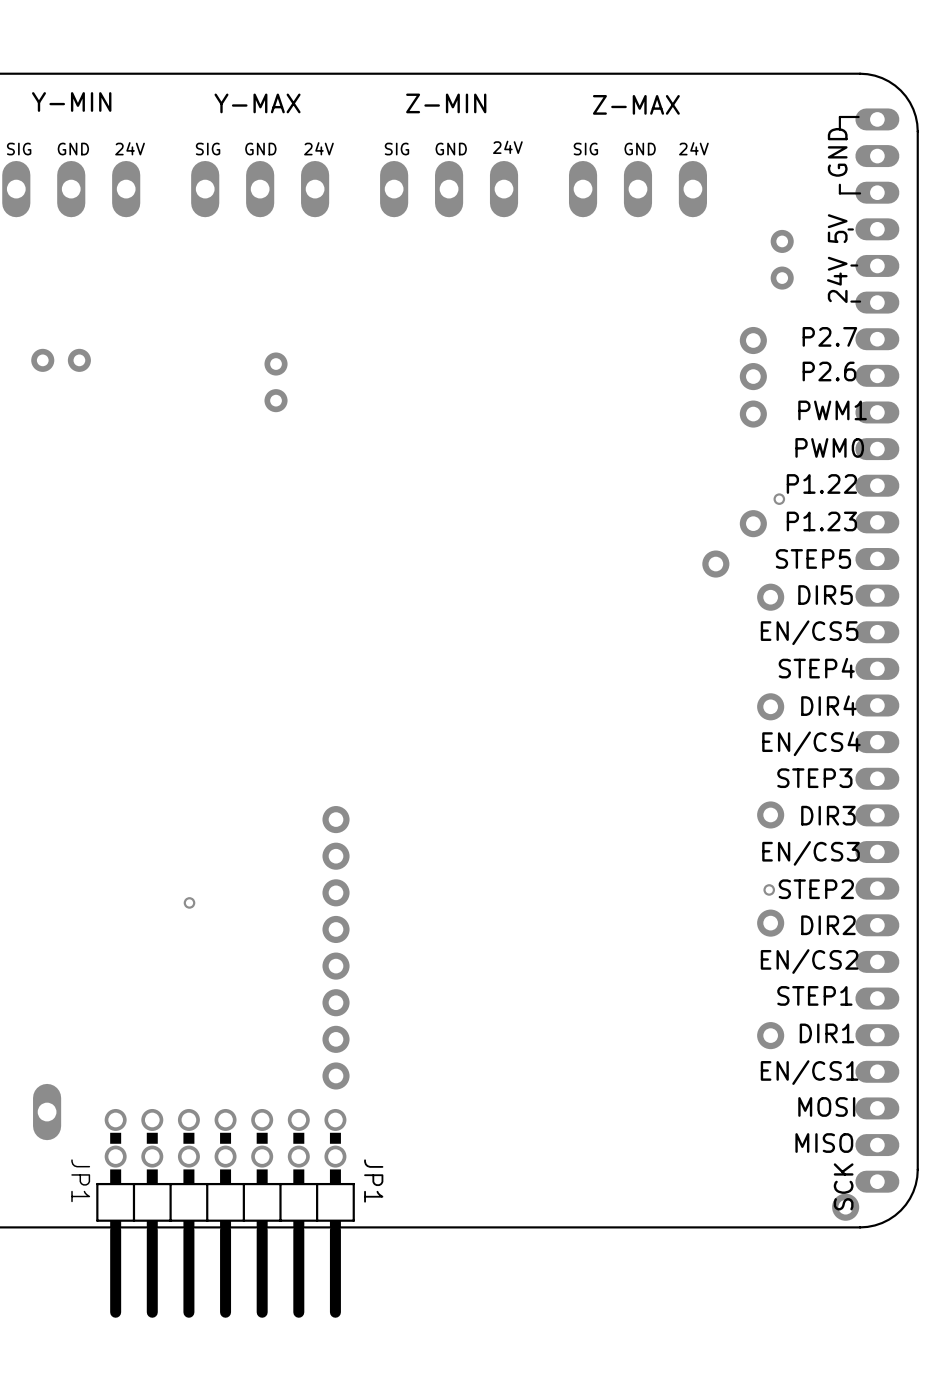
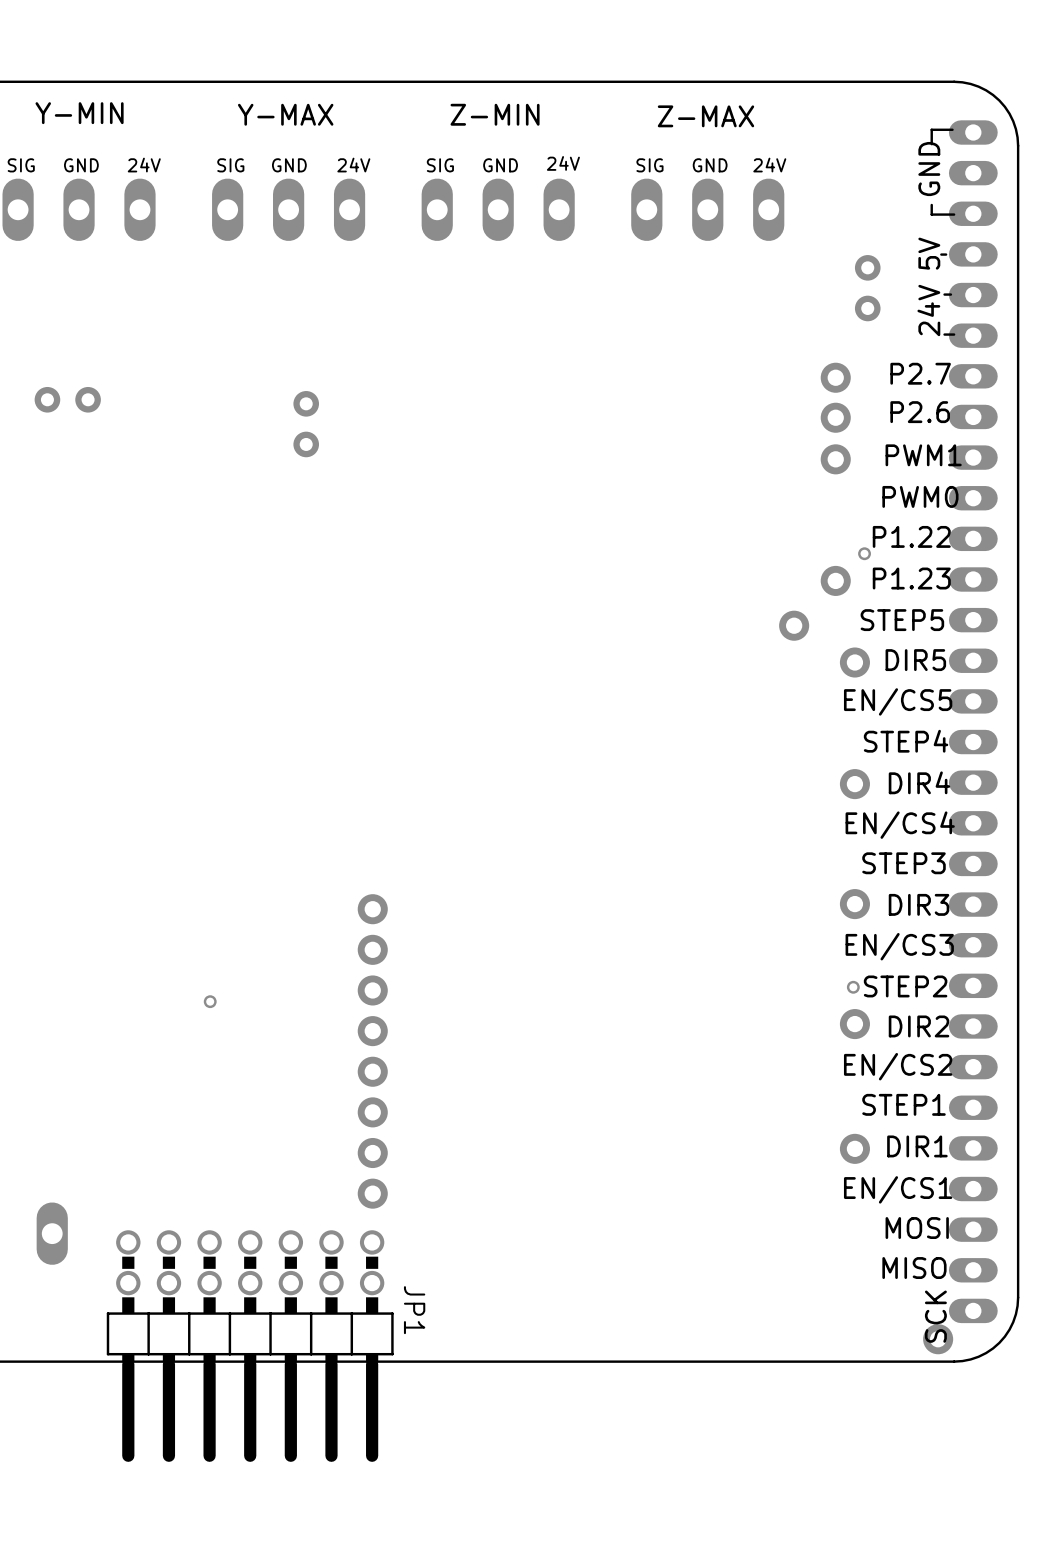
JP1 value: JP1 (80, 1180) -> none

